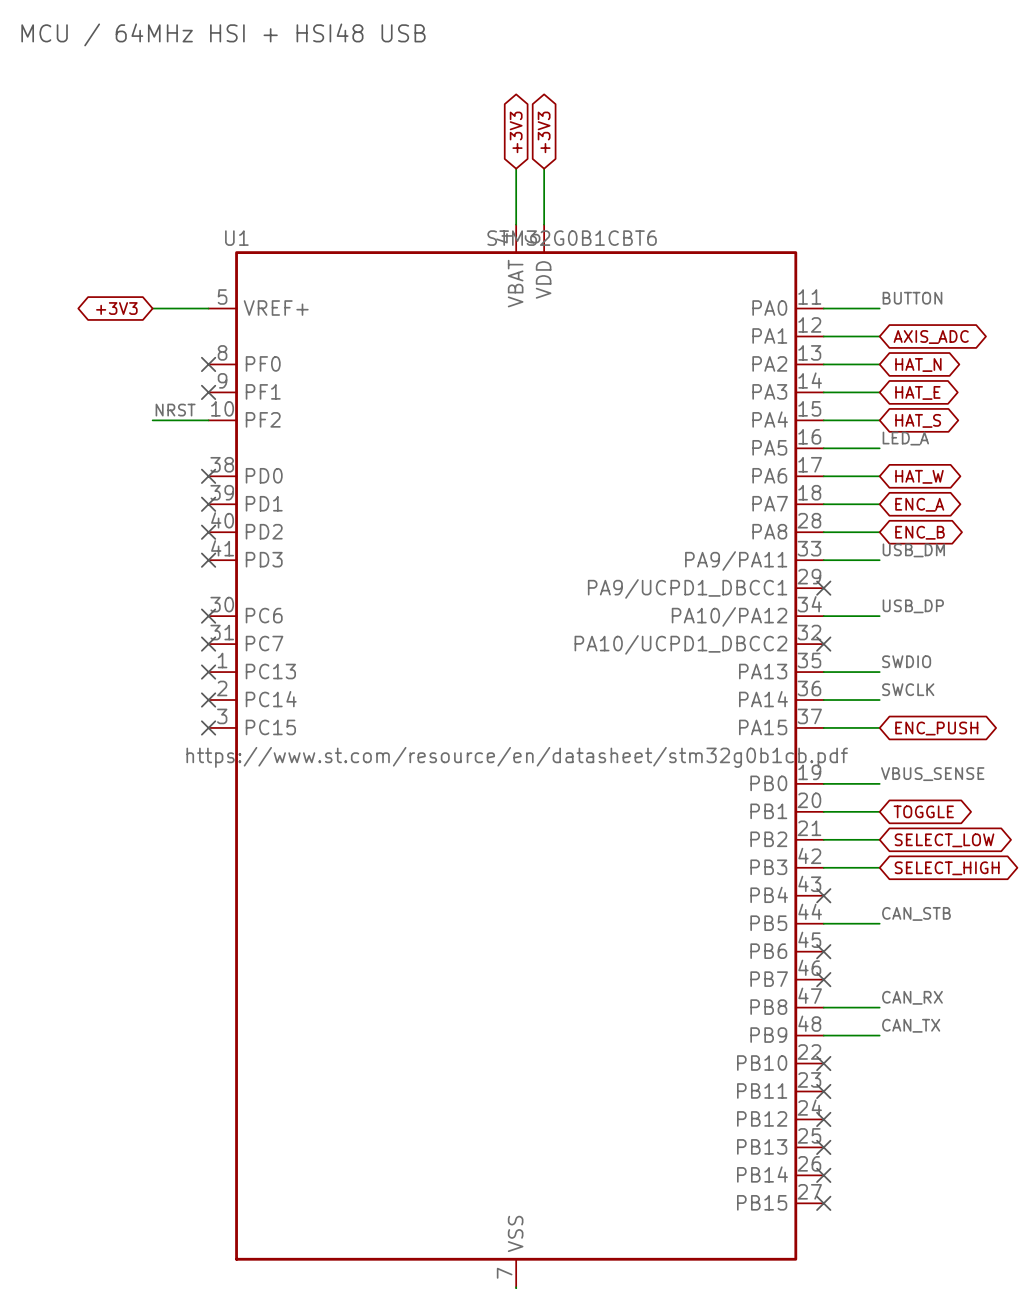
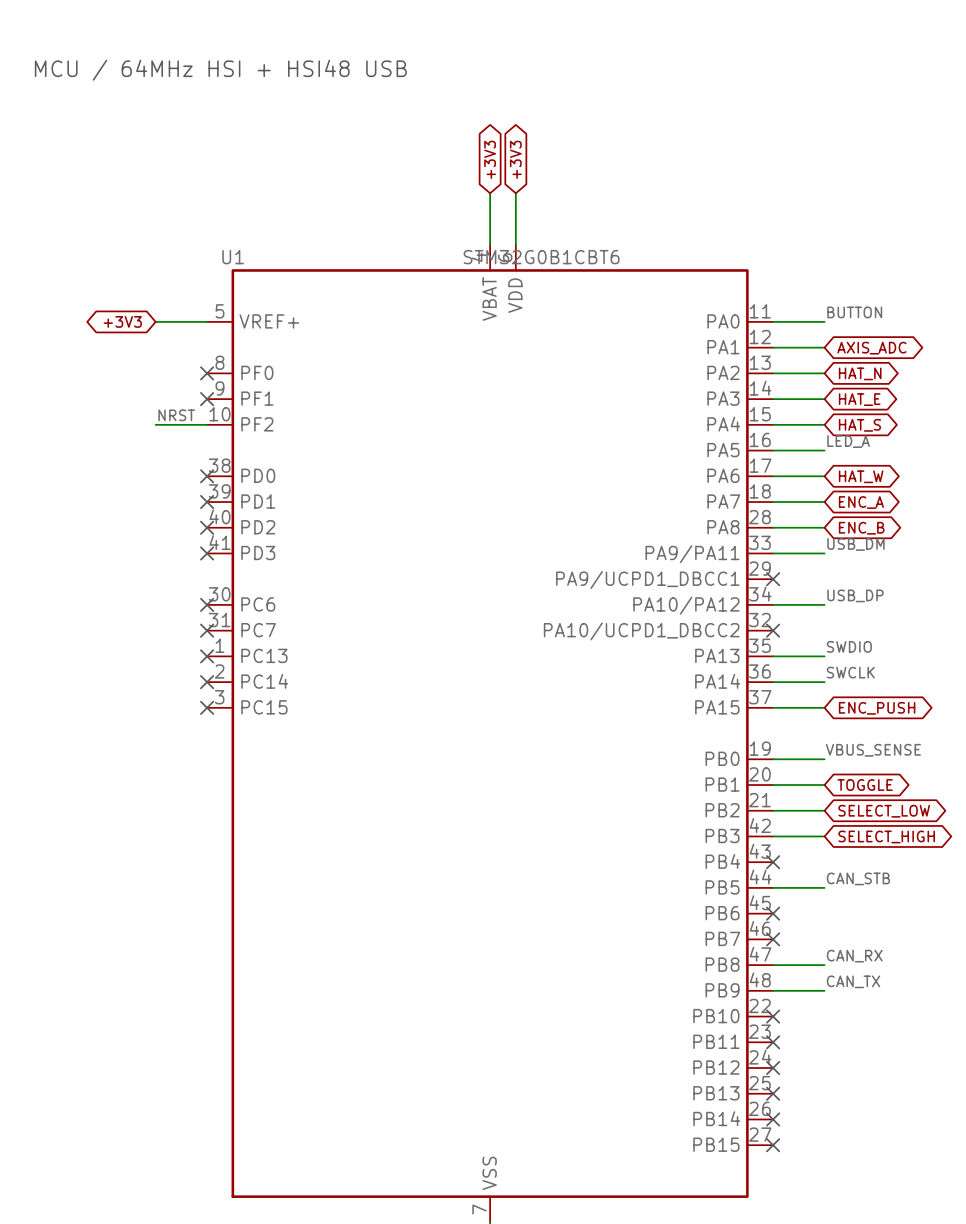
U1 text: https://www.st.com/resource/en/datasheet/stm32g0b1cb.pdf (517, 757) -> none

